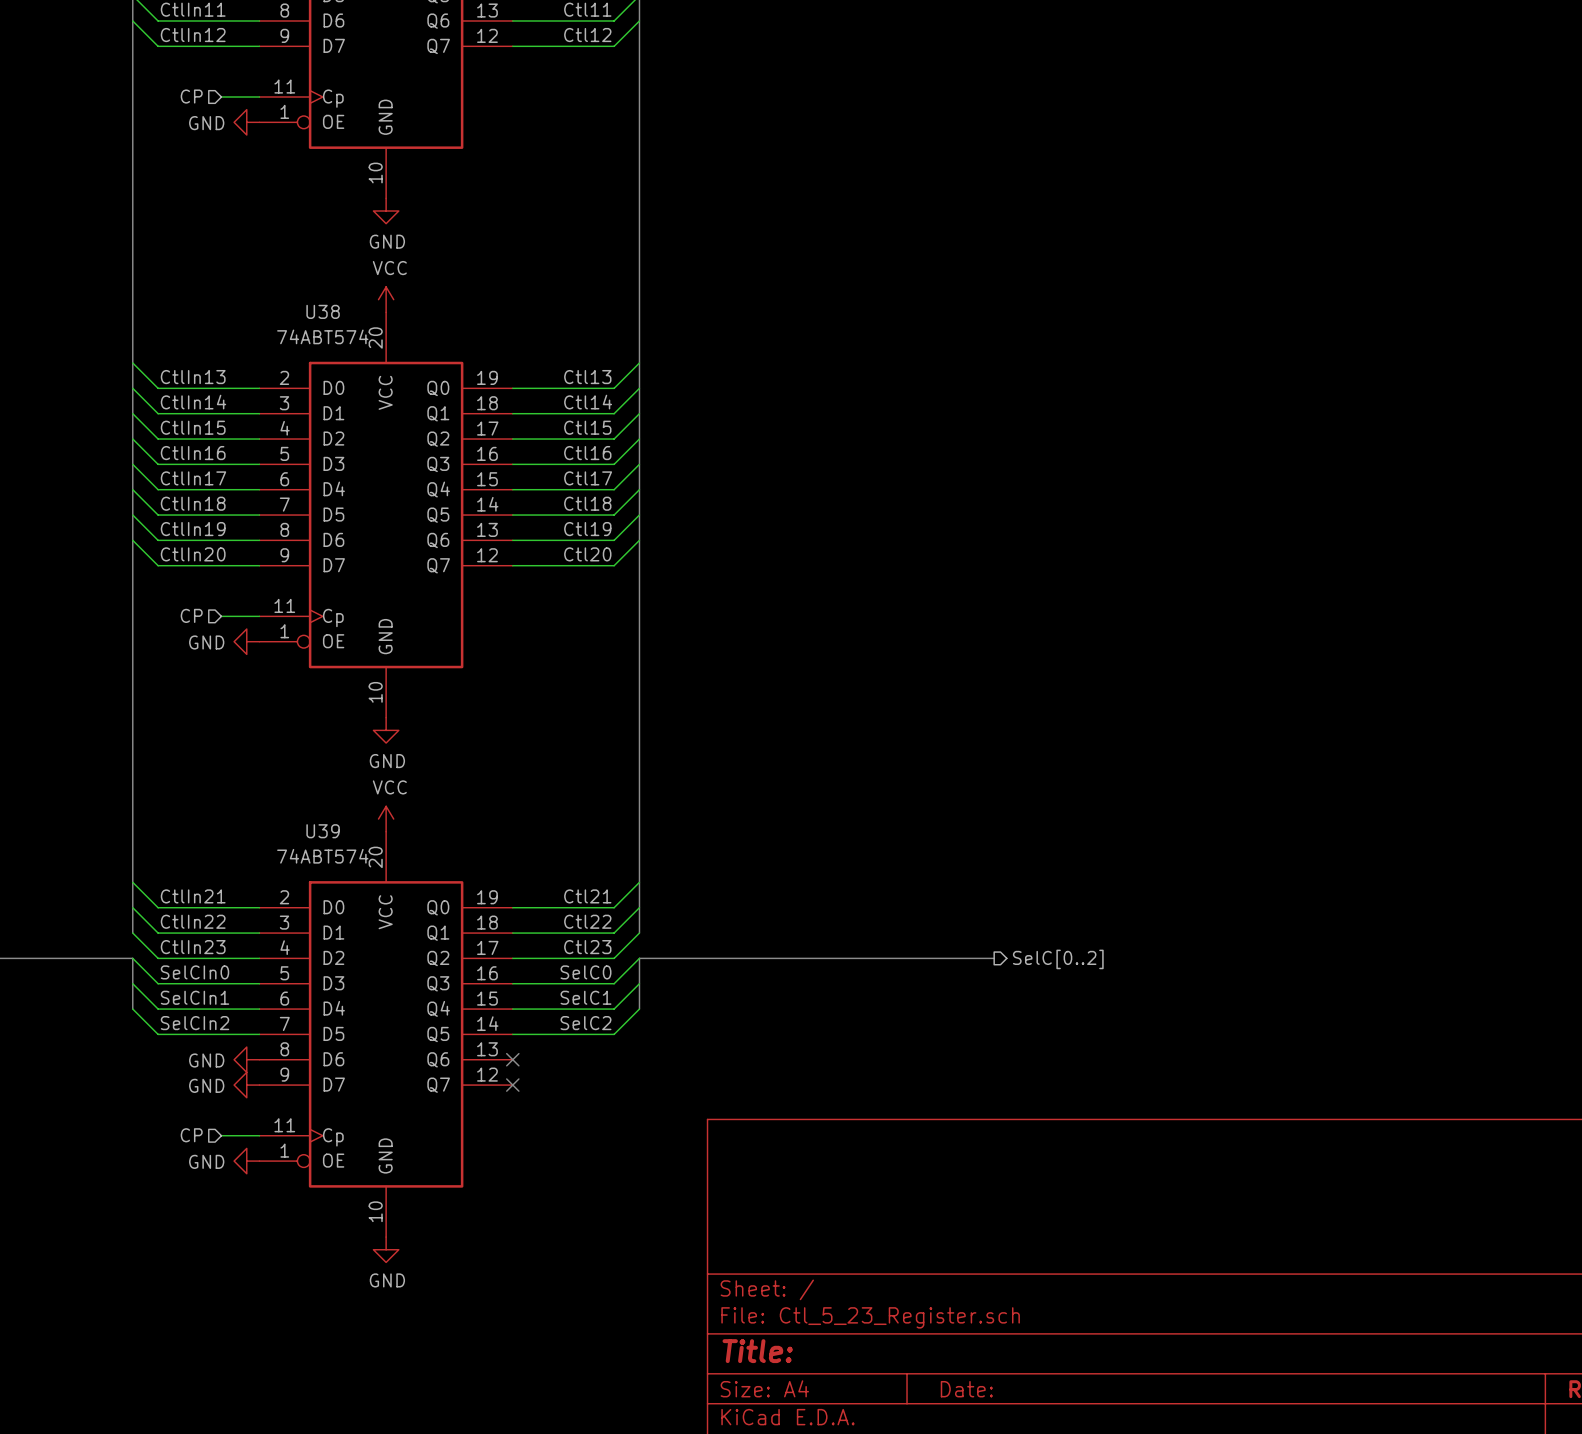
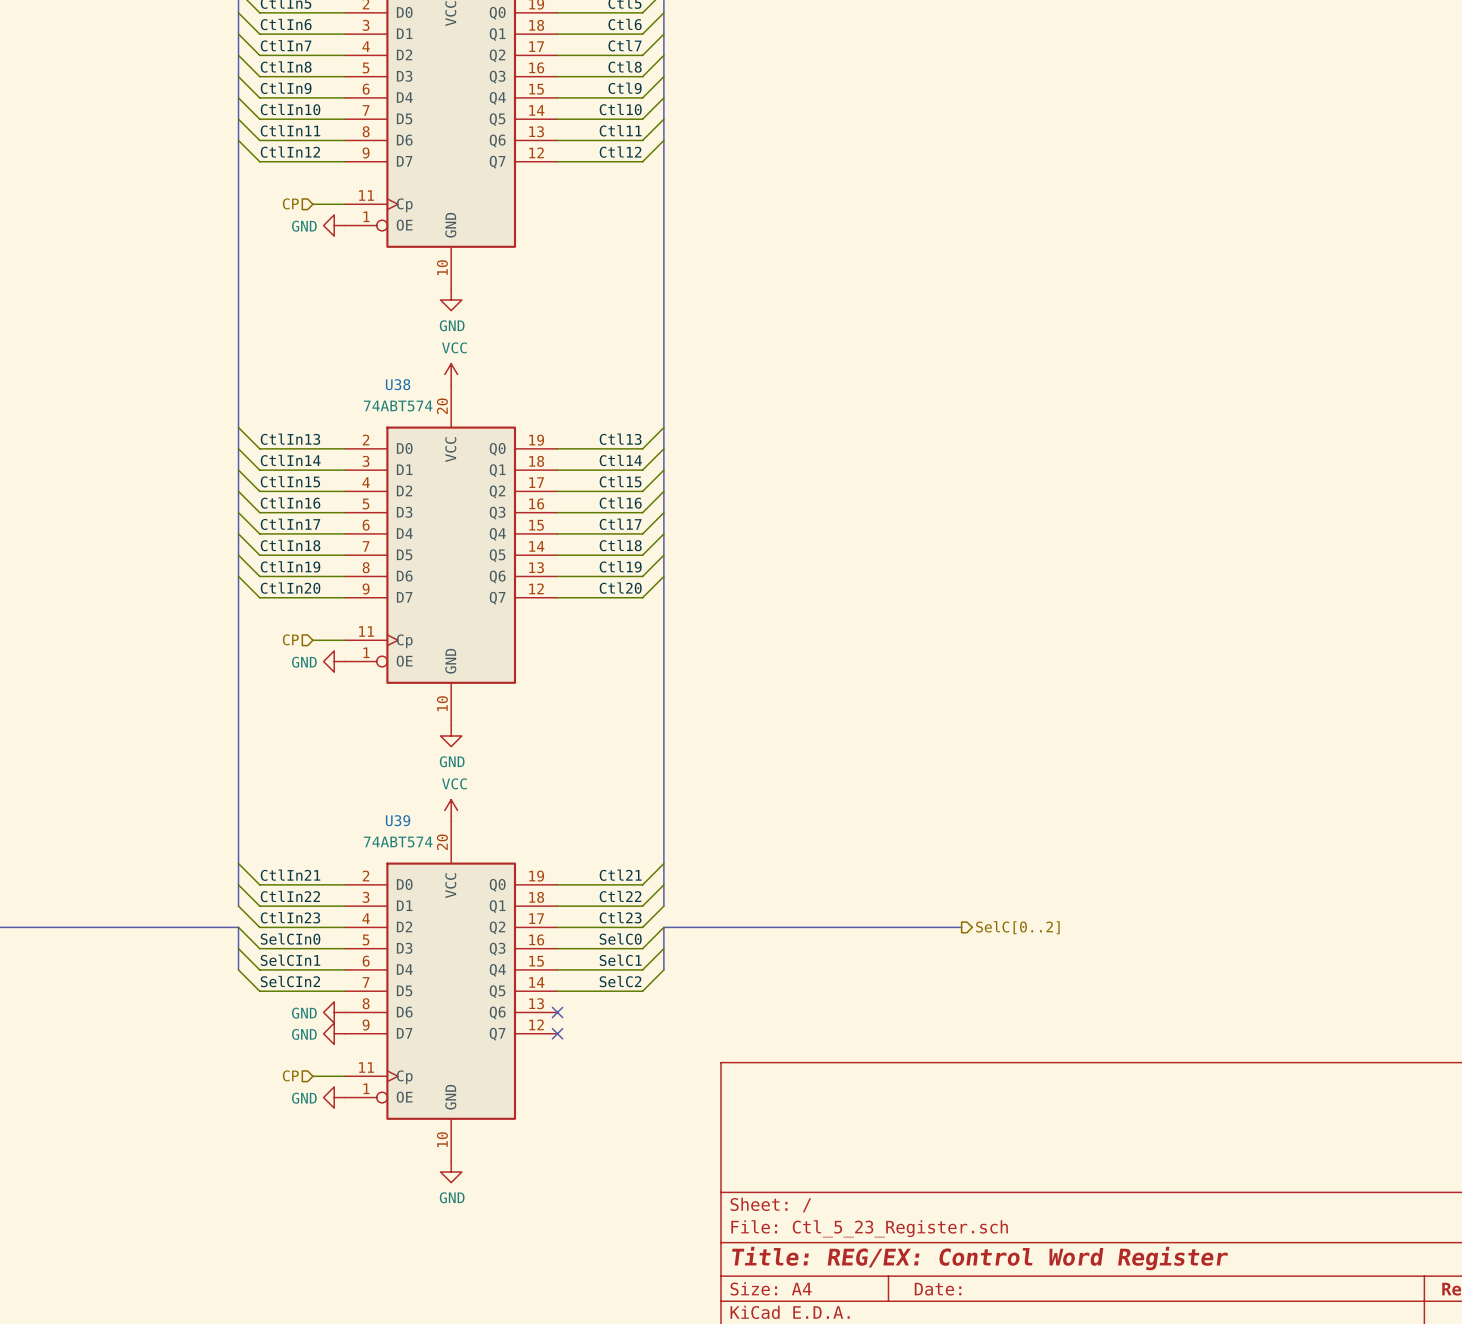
title block: Title: (757, 1351) -> Title: REG/EX: Control Word Register (979, 1258)

